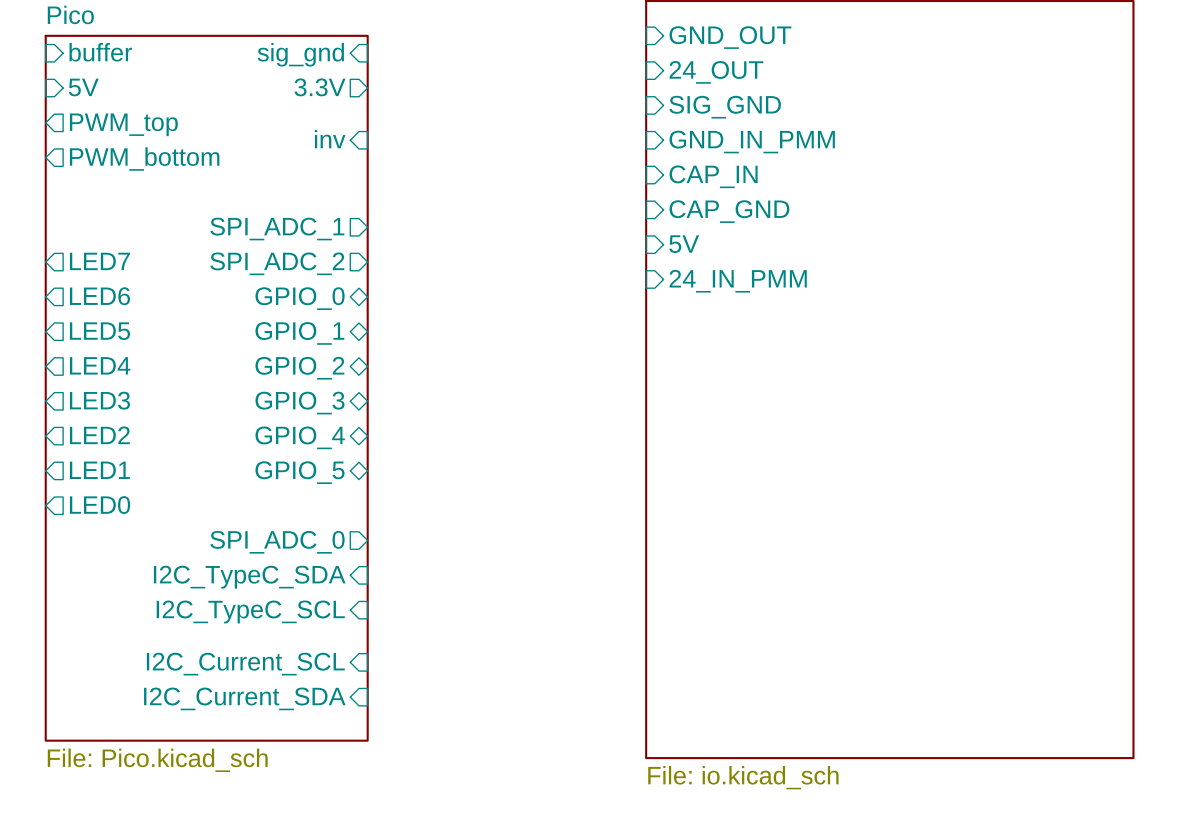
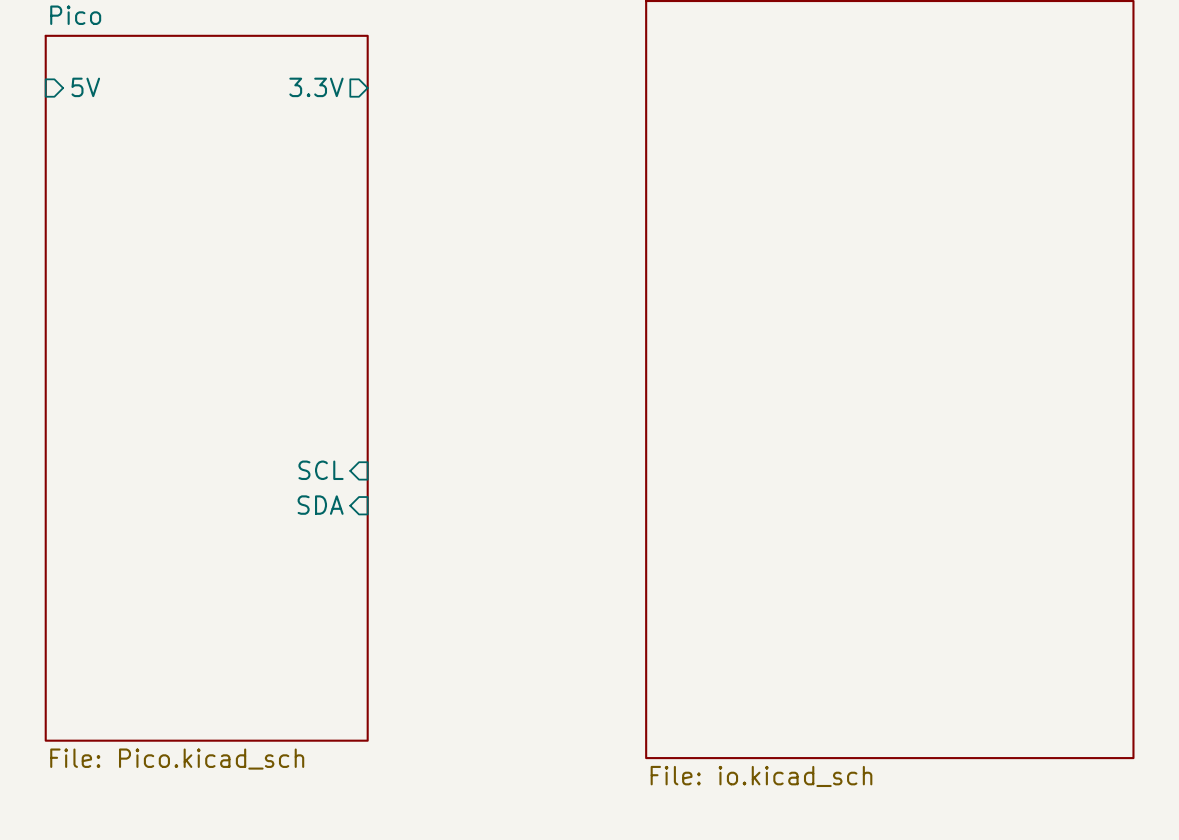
sheet pin: GND_OUT (730, 37) -> none
sheet pin: buffer (100, 52) -> none
sheet pin: sig_gnd (300, 54) -> none
sheet pin: 24_OUT (716, 72) -> none
sheet pin: SIG_GND (725, 107) -> none
sheet pin: PWM_top (123, 124) -> none
sheet pin: inv (330, 139) -> none
sheet pin: GND_IN_PMM (752, 141) -> none
sheet pin: PWM_bottom (144, 159) -> none
sheet pin: CAP_IN (713, 176) -> none
sheet pin: CAP_GND (729, 211) -> none
sheet pin: SPI_ADC_1 (277, 229) -> none
sheet pin: 5V (684, 244) -> none
sheet pin: LED7 (99, 261) -> none
sheet pin: SPI_ADC_2 (277, 263) -> none
sheet pin: 24_IN_PMM (738, 281) -> none
sheet pin: LED6 (99, 296) -> none
sheet pin: GPIO_0 (300, 298) -> none
sheet pin: LED5 (99, 331) -> none
sheet pin: GPIO_1 (299, 333) -> none
sheet pin: LED4 (100, 365) -> none
sheet pin: GPIO_2 (299, 368) -> none
sheet pin: LED3 (99, 400) -> none
sheet pin: GPIO_3 (299, 403) -> none
sheet pin: LED2 (99, 435) -> none
sheet pin: GPIO_4 (300, 437) -> none
sheet pin: LED1 (99, 470) -> none
sheet pin shape: bidirectional (300, 472) -> input (321, 470)
sheet pin: GPIO_5 (300, 472) -> SCL (321, 470)
sheet pin: LED0 (100, 505) -> none
sheet pin: none -> SDA (320, 505)
sheet pin: SPI_ADC_0 (277, 542) -> none
sheet pin: I2C_TypeC_SDA (249, 577) -> none
sheet pin: I2C_TypeC_SCL (250, 611) -> none
sheet pin: I2C_Current_SCL (245, 664) -> none
sheet pin: I2C_Current_SDA (244, 698) -> none

